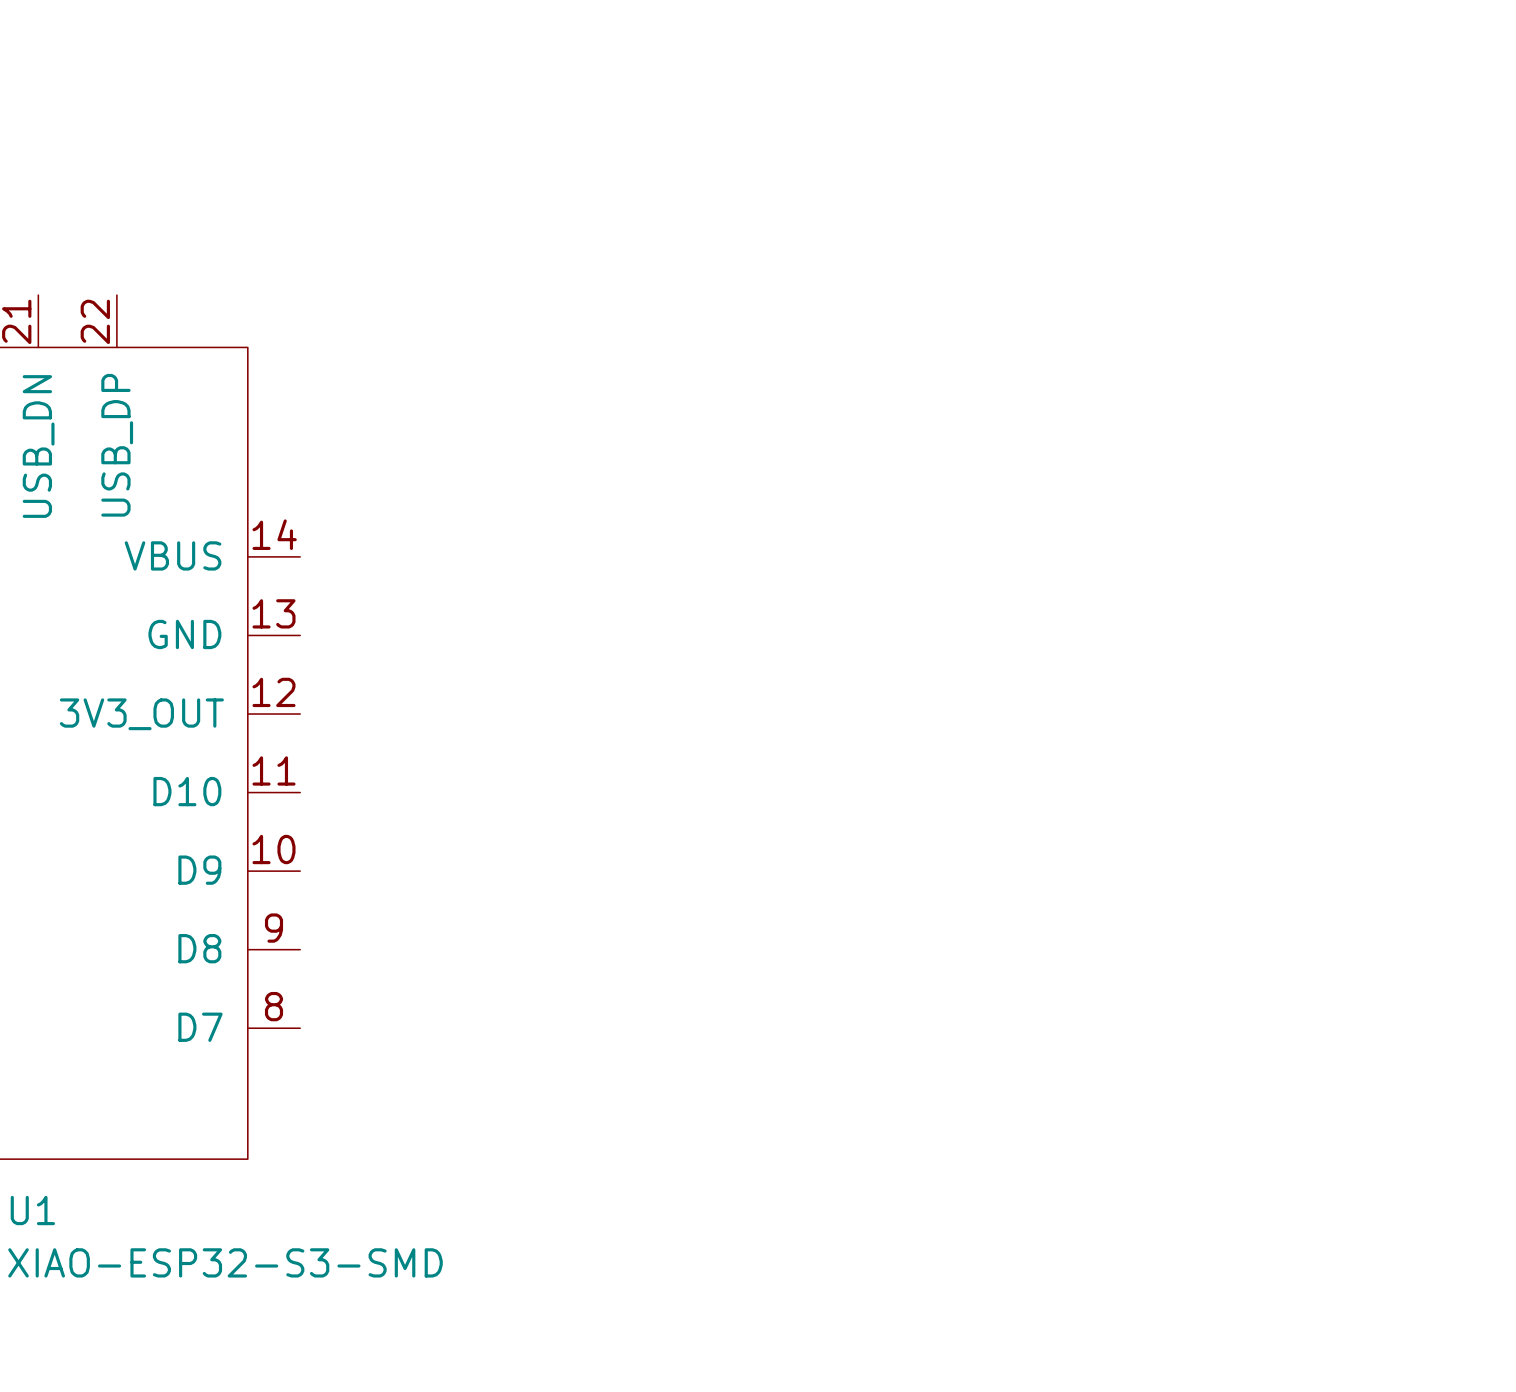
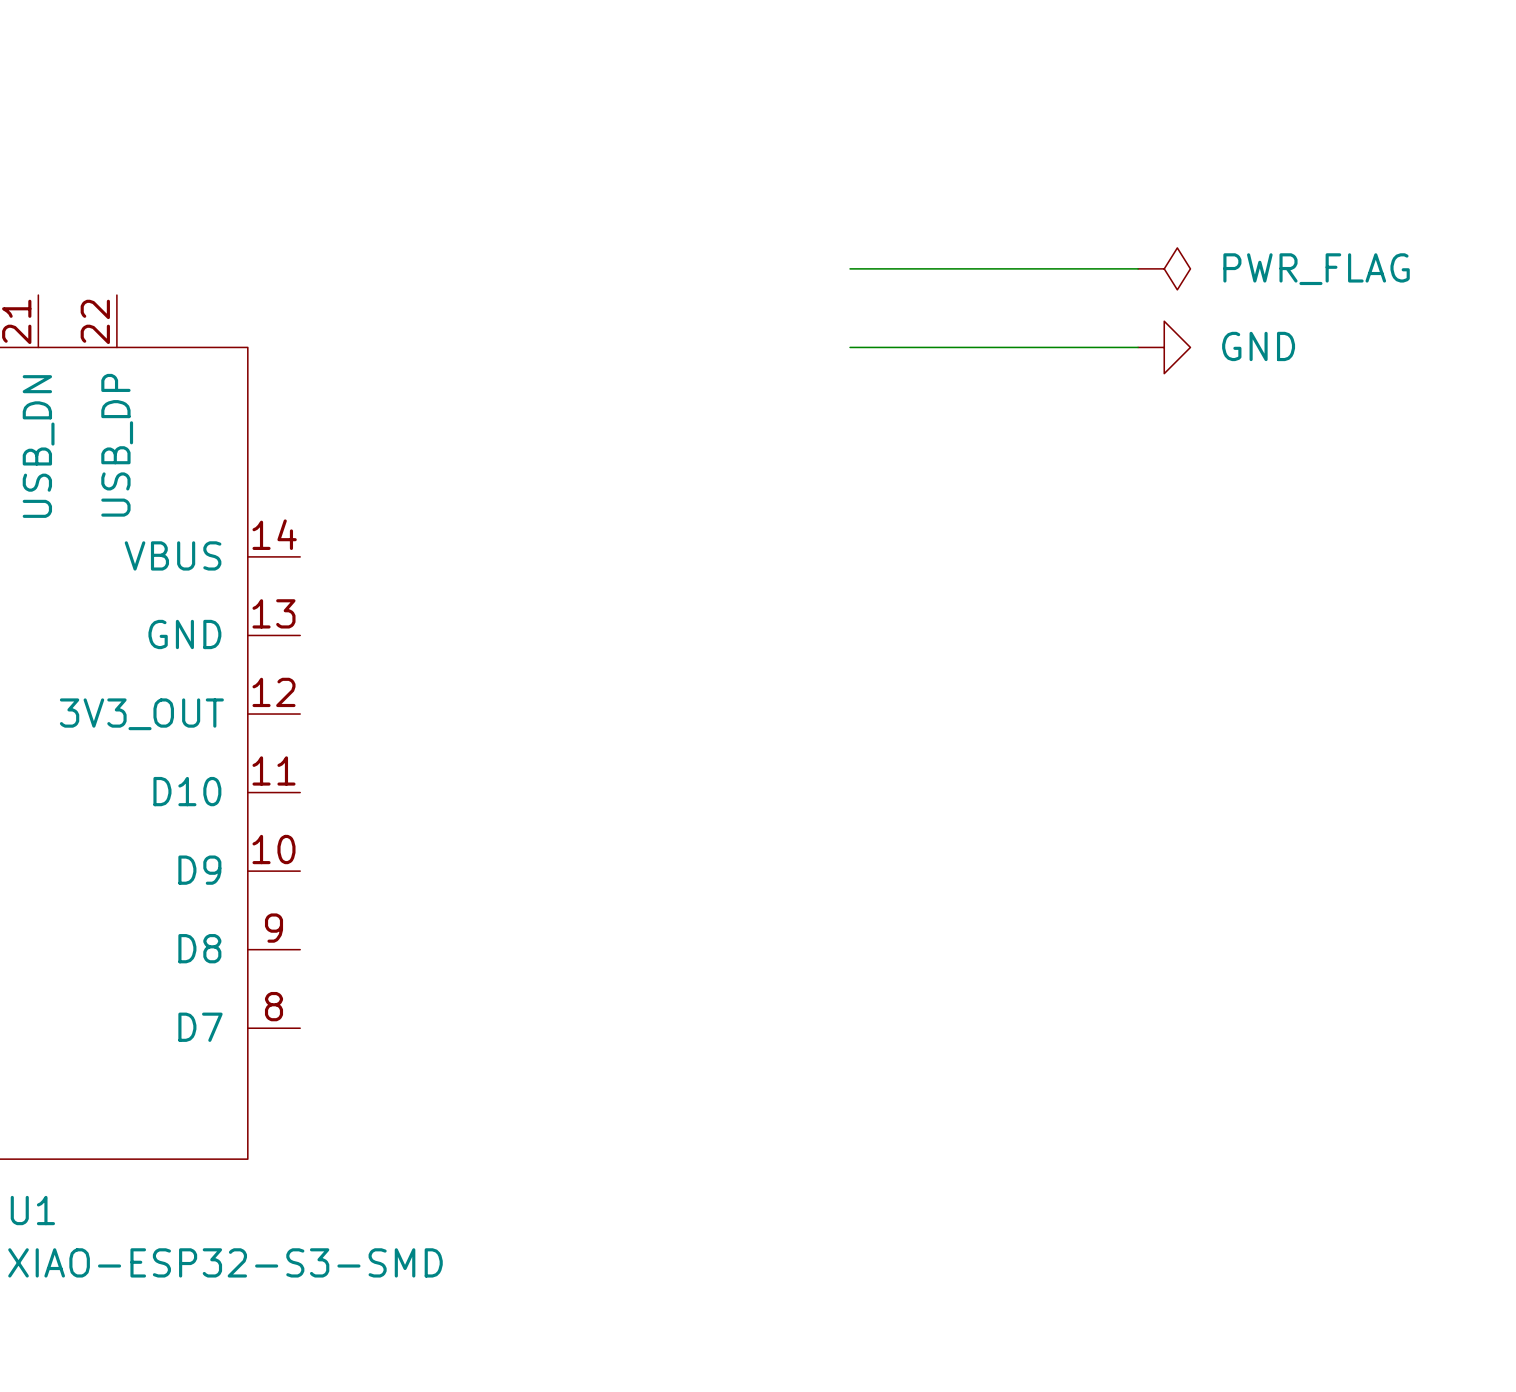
wire: none -> (850, 268) (1138, 268)
power symbol: none -> PWR_FLAG (1164, 268)
wire: none -> (850, 347) (1138, 347)
power symbol: none -> GND (1164, 347)

